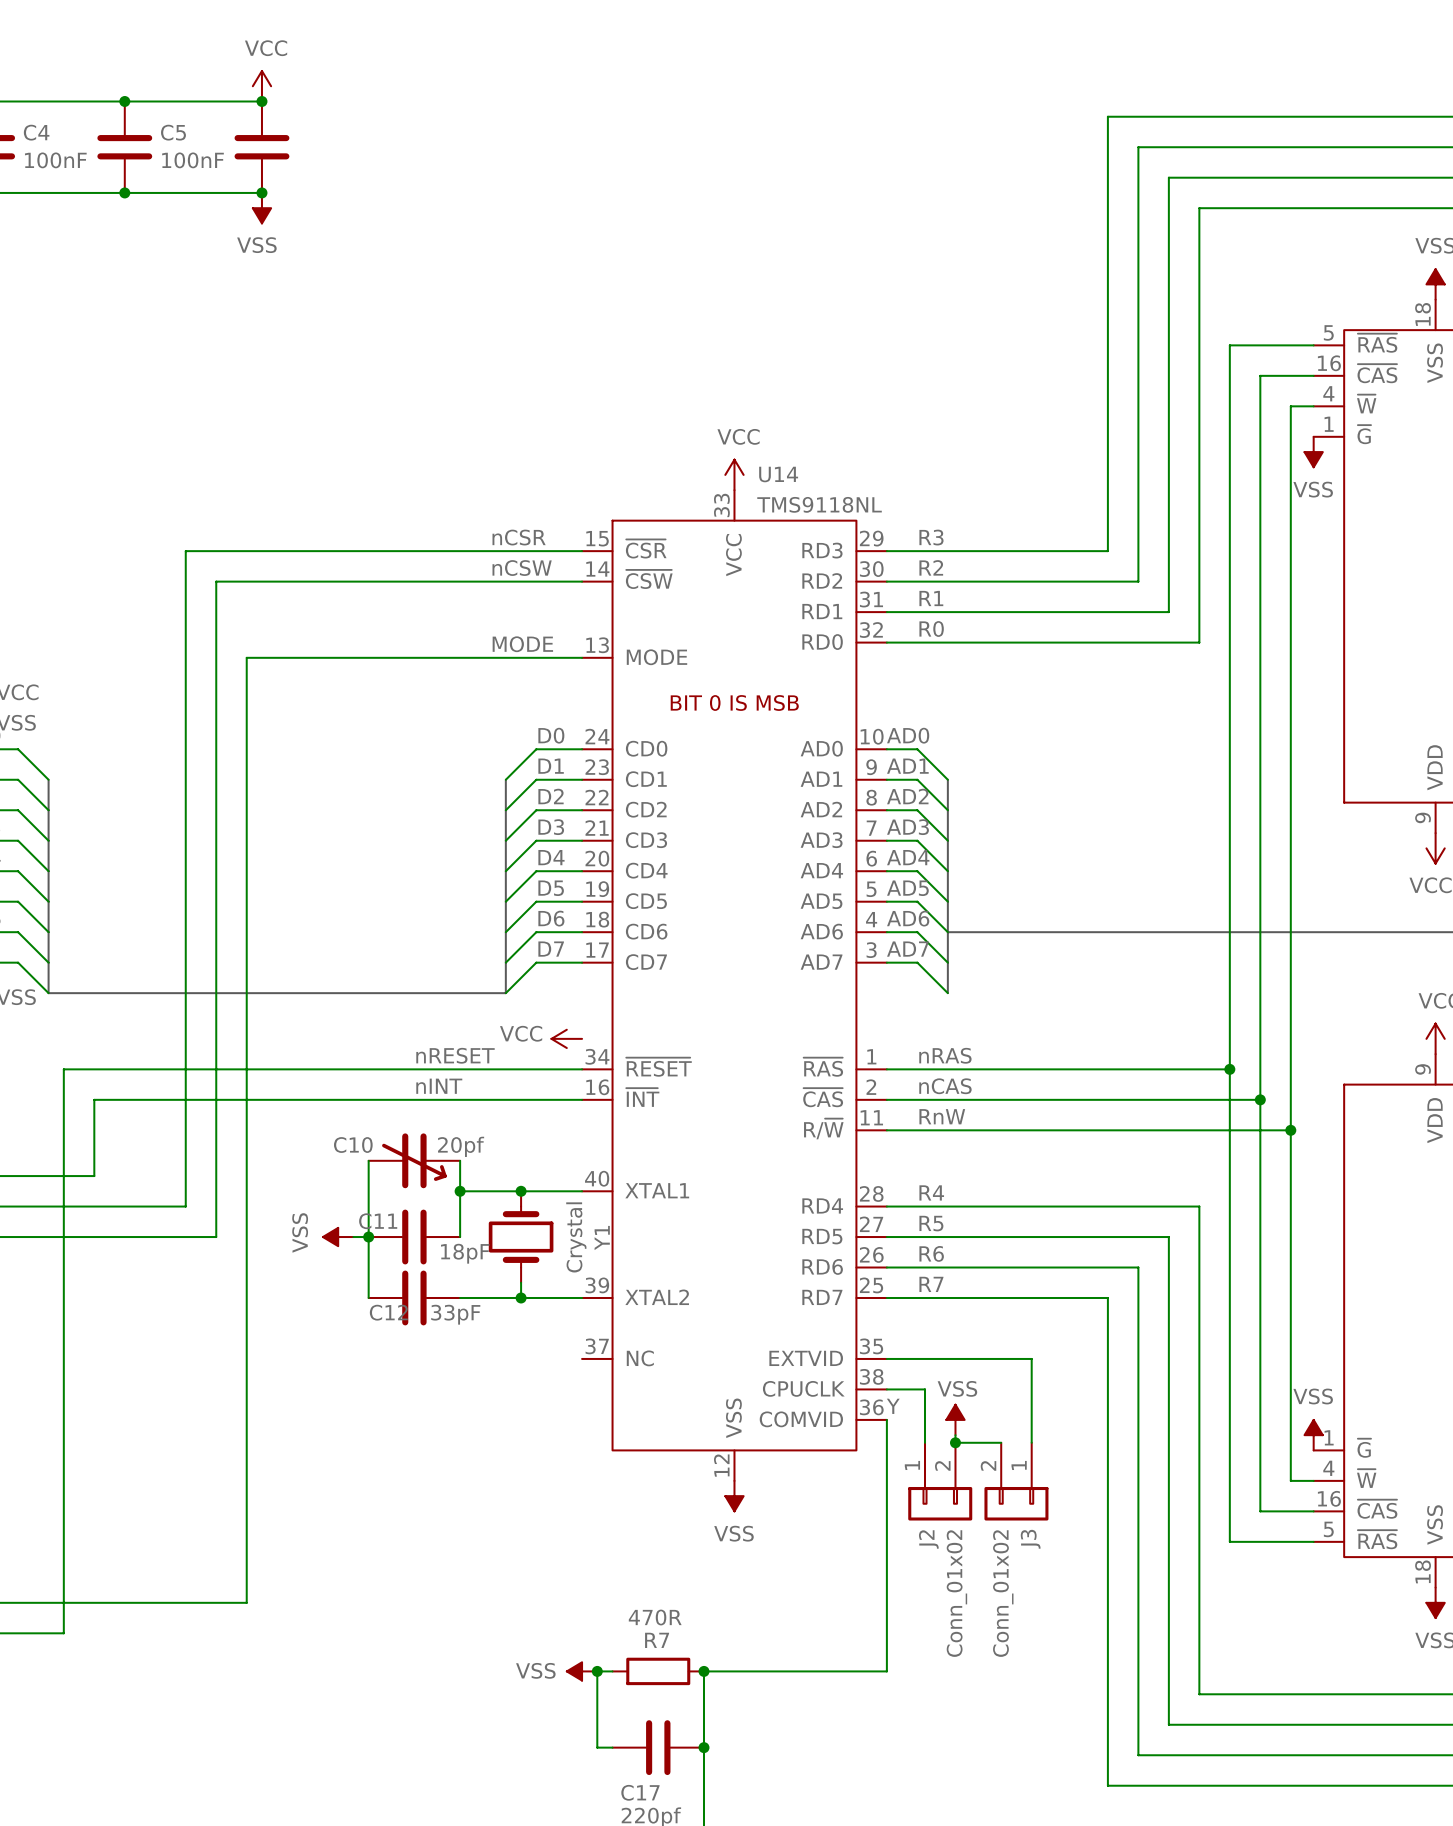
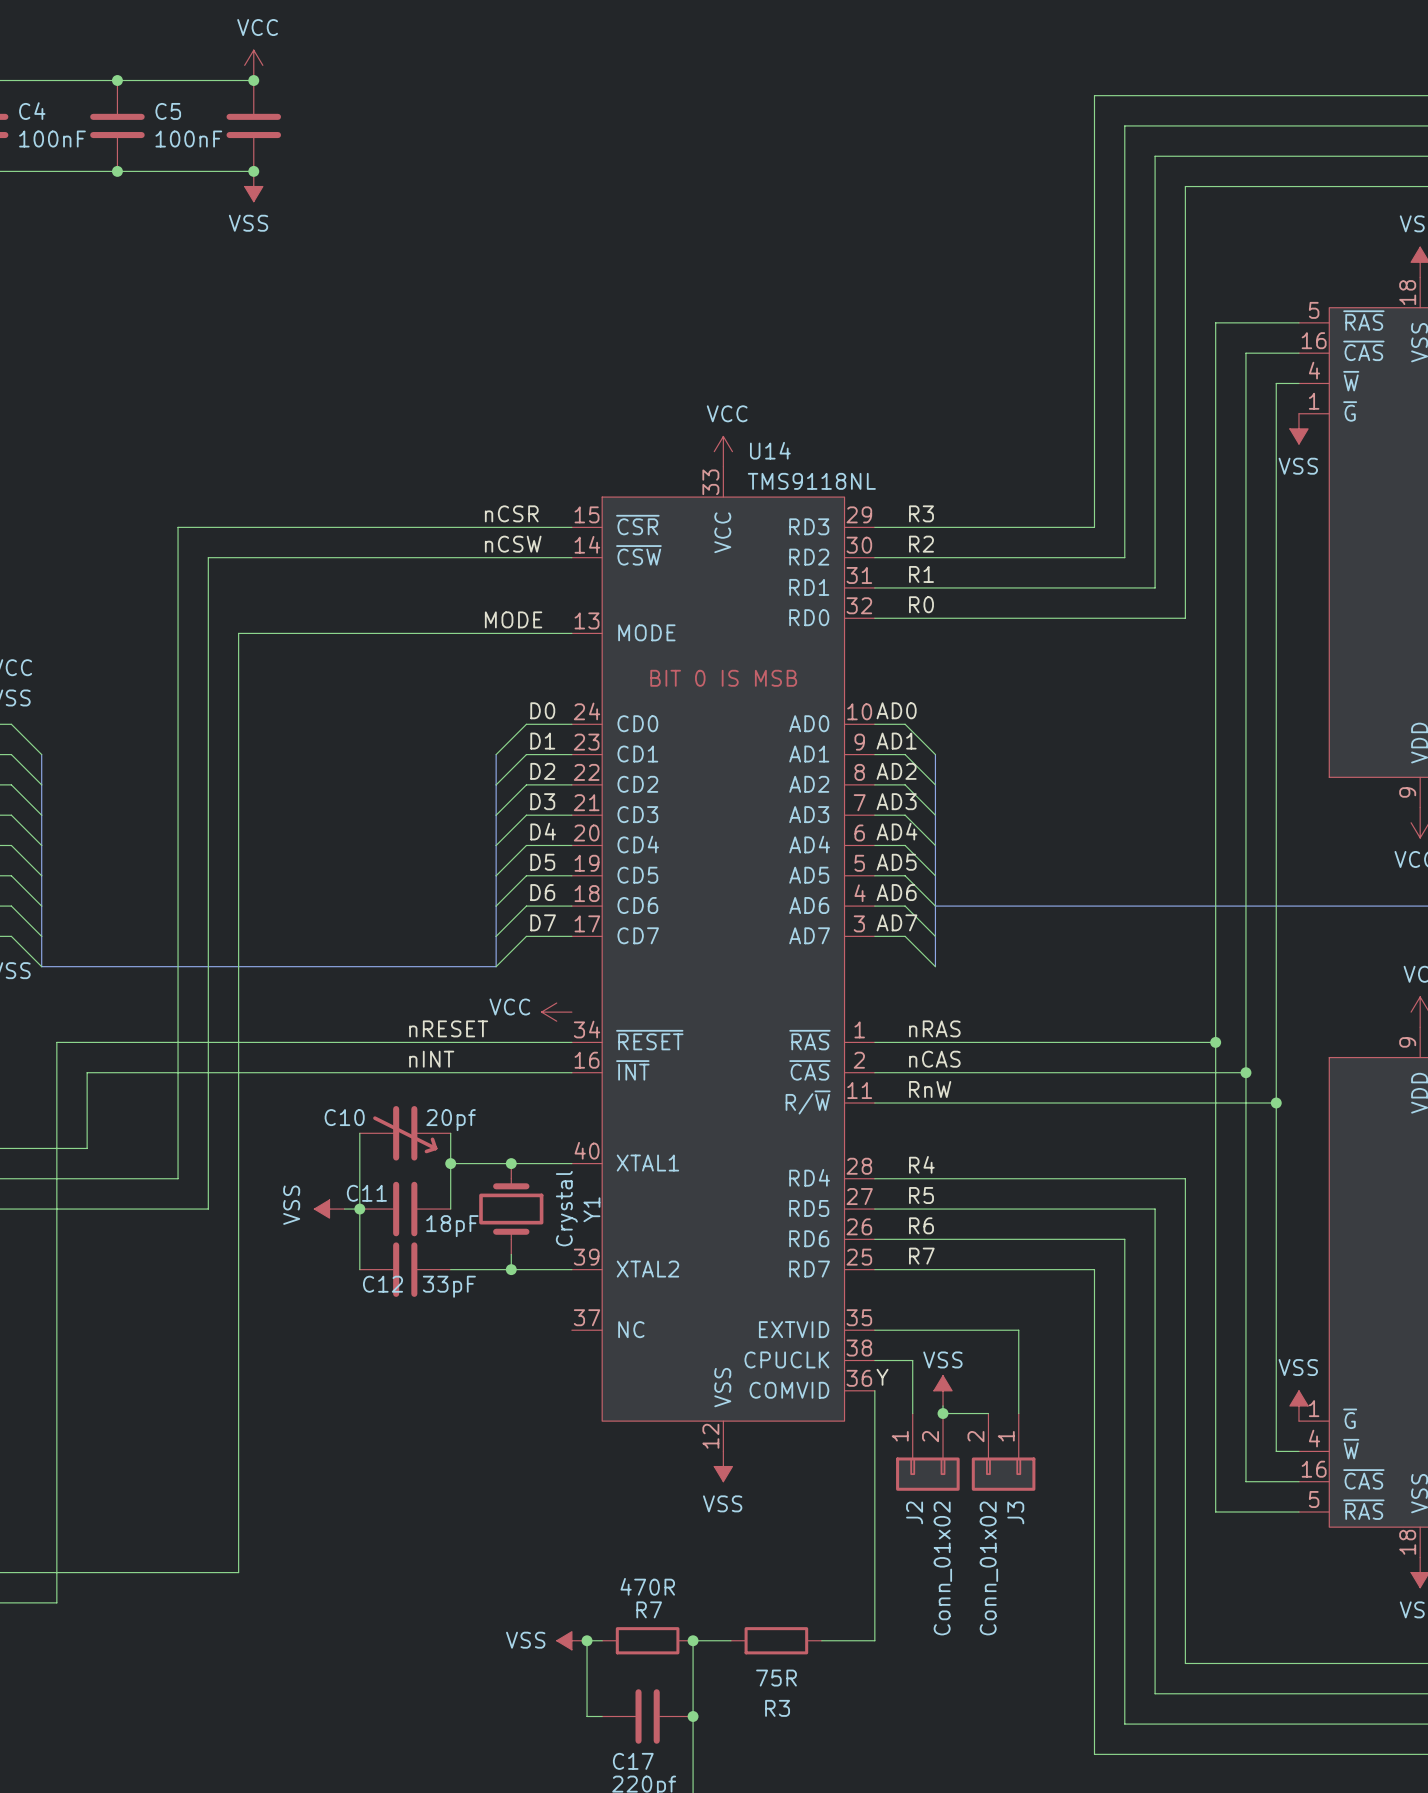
wire: (742, 1671) (833, 1671) -> none
R3: none -> 75R (776, 1640)

